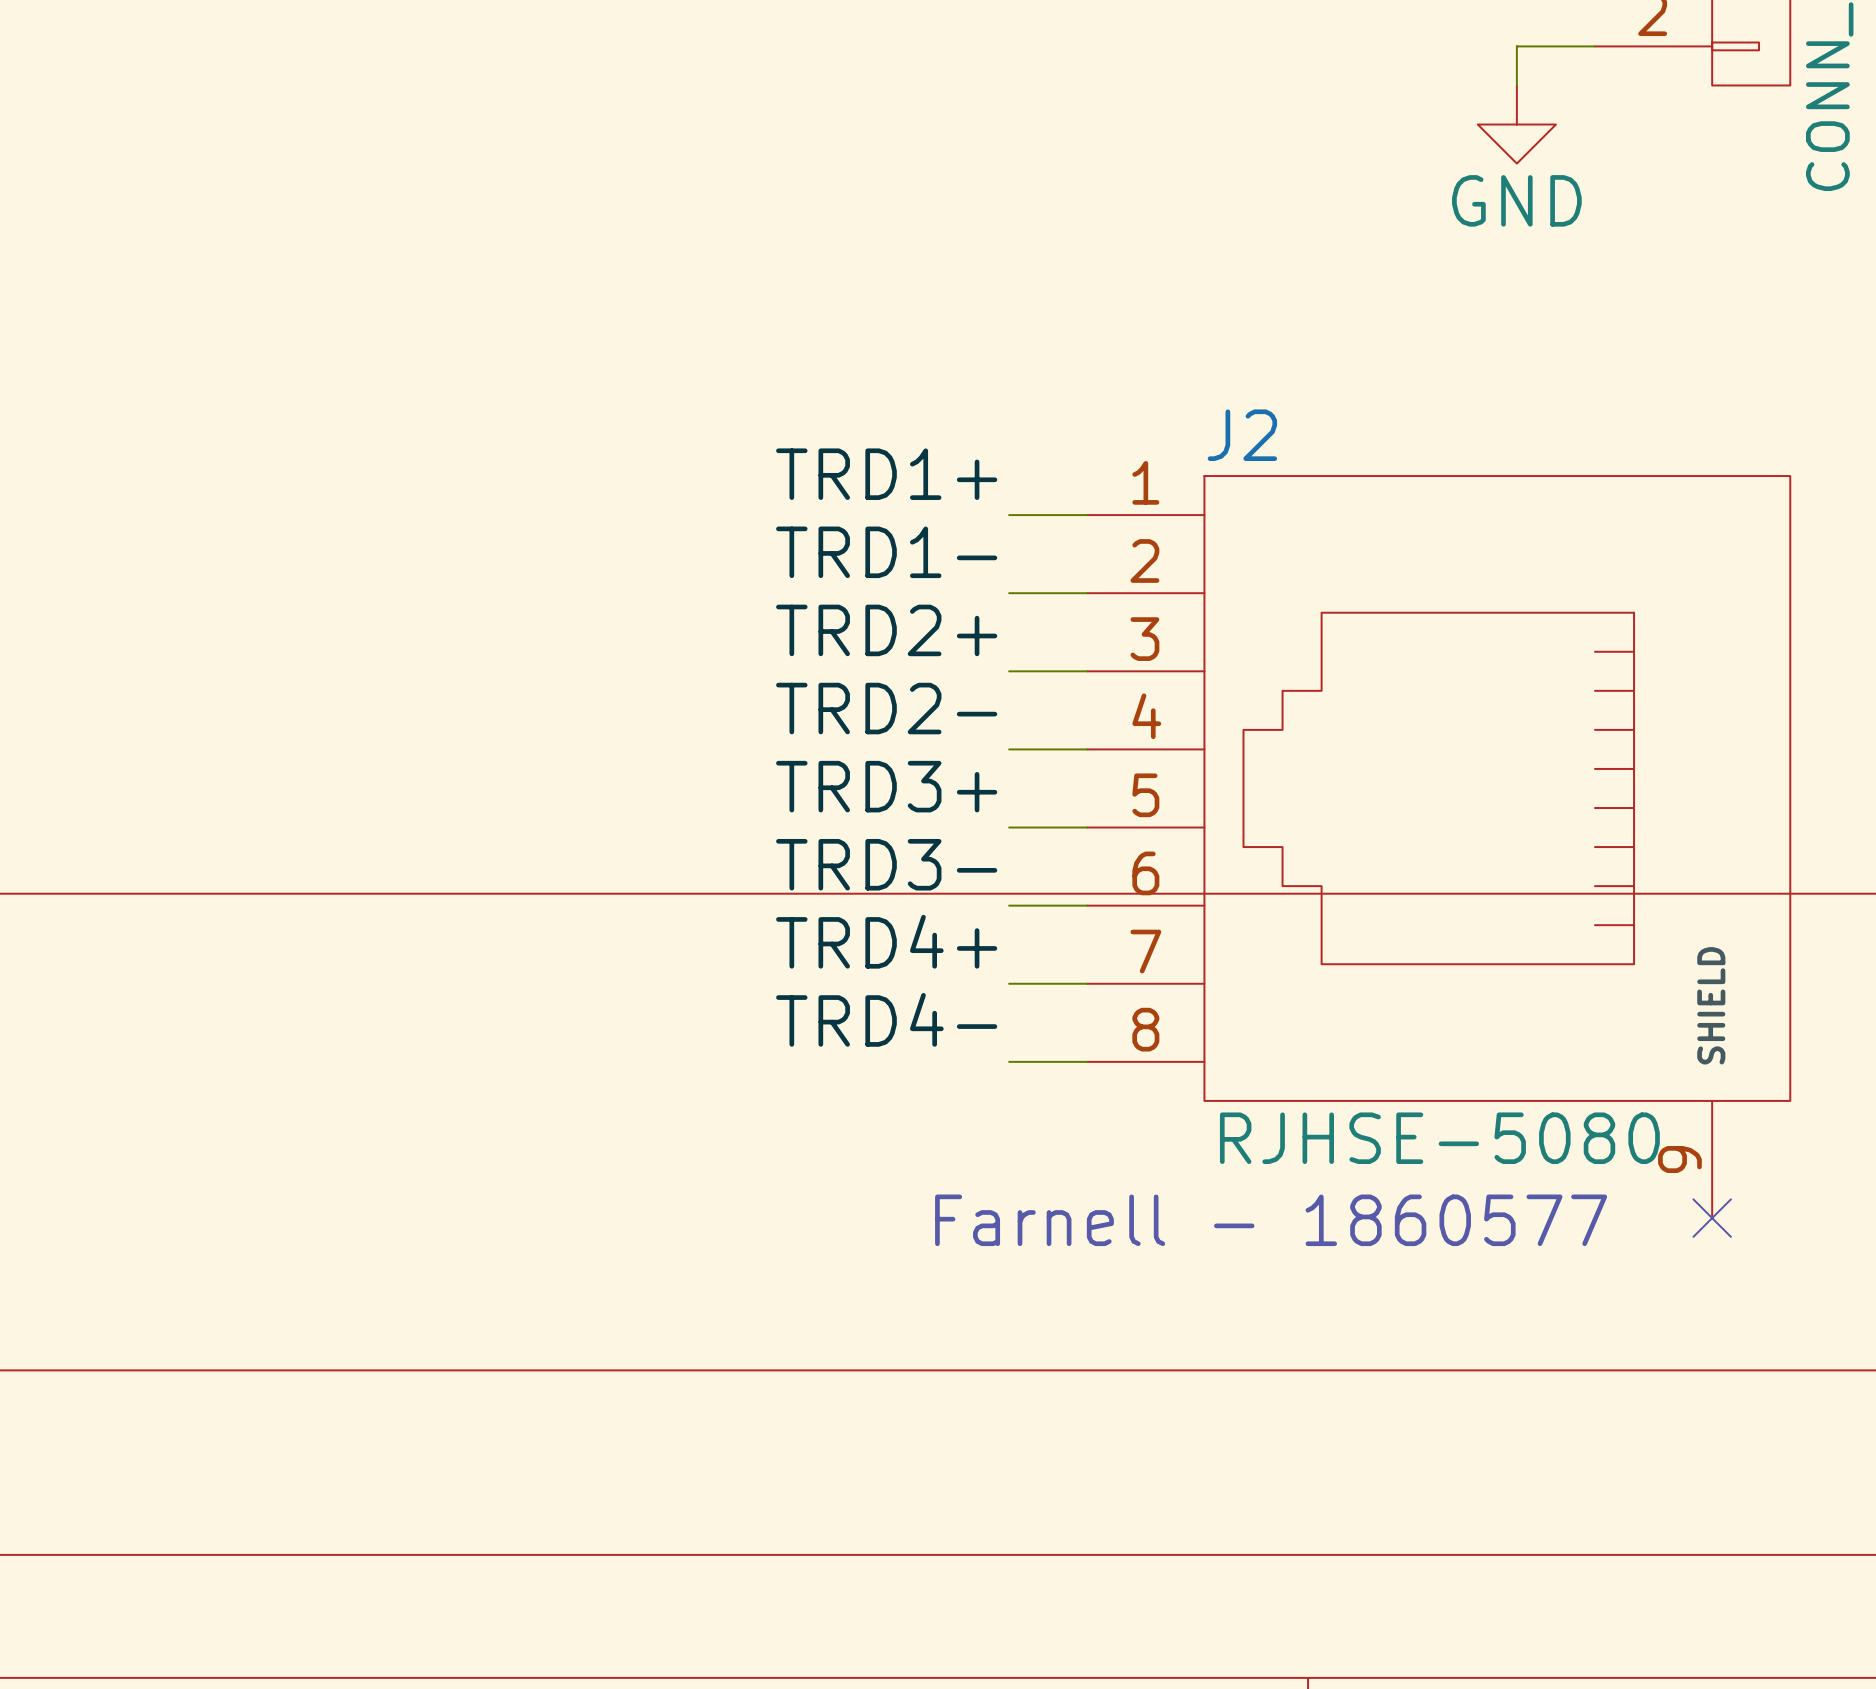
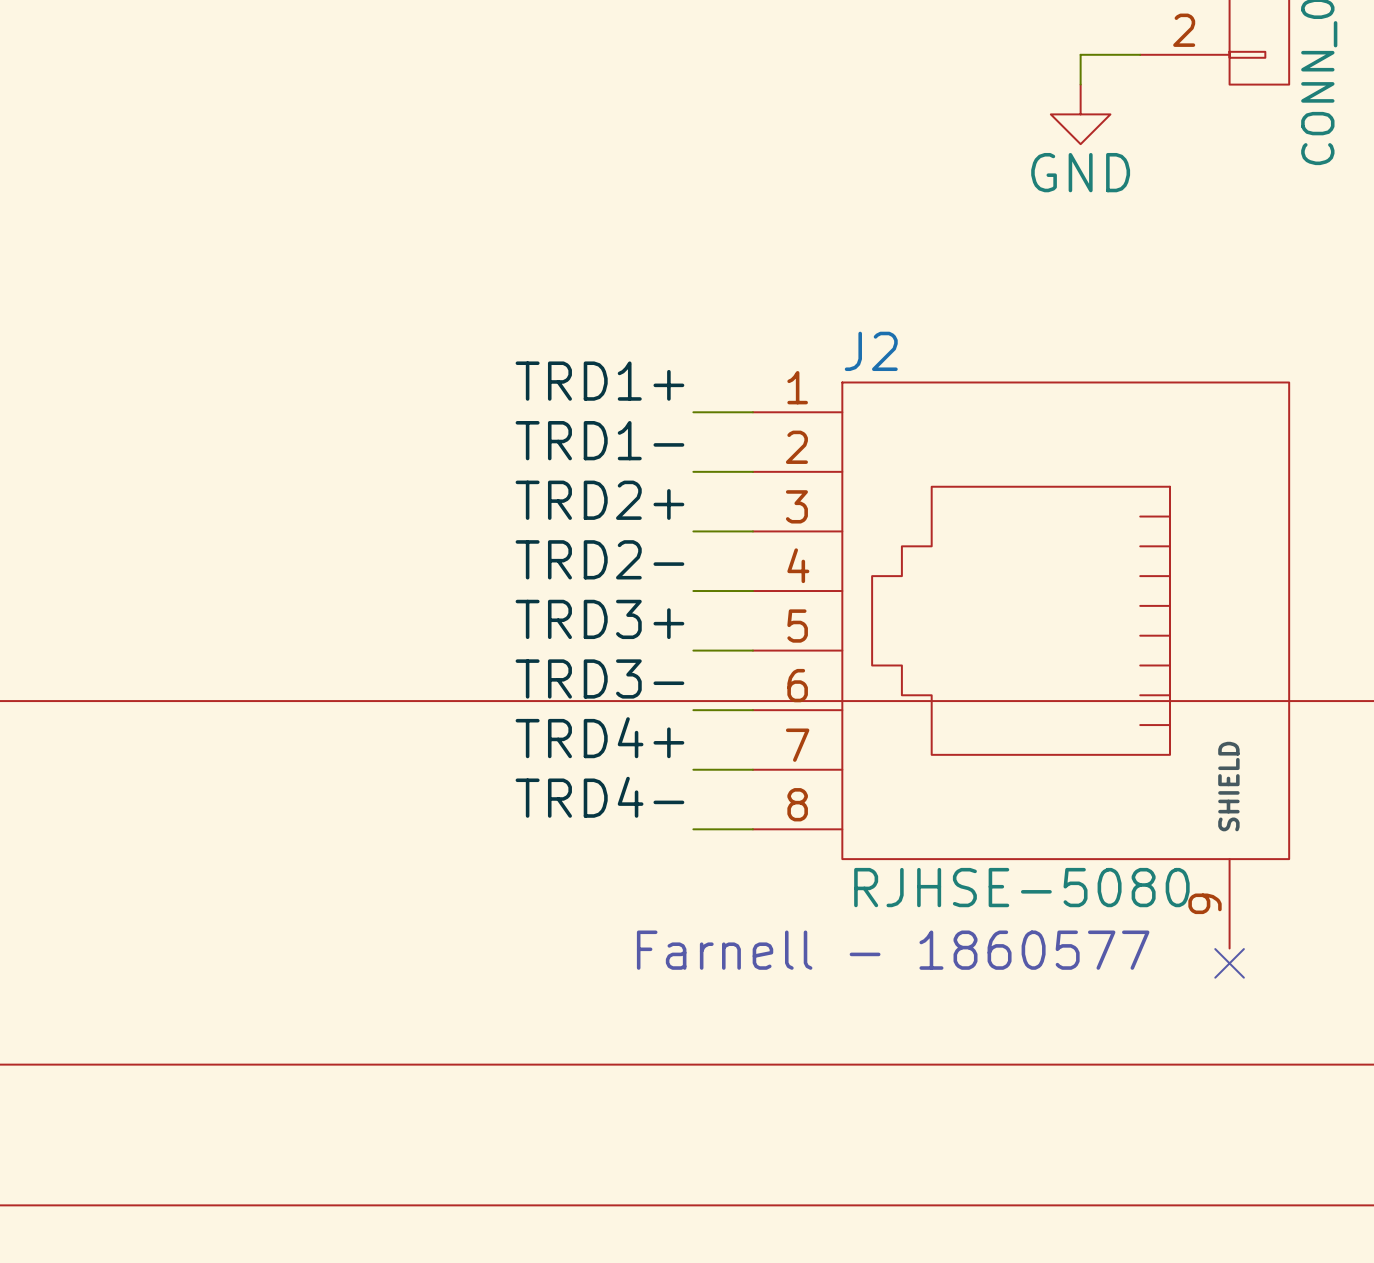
no-connect mark position: (1712, 1218) -> (1229, 963)

